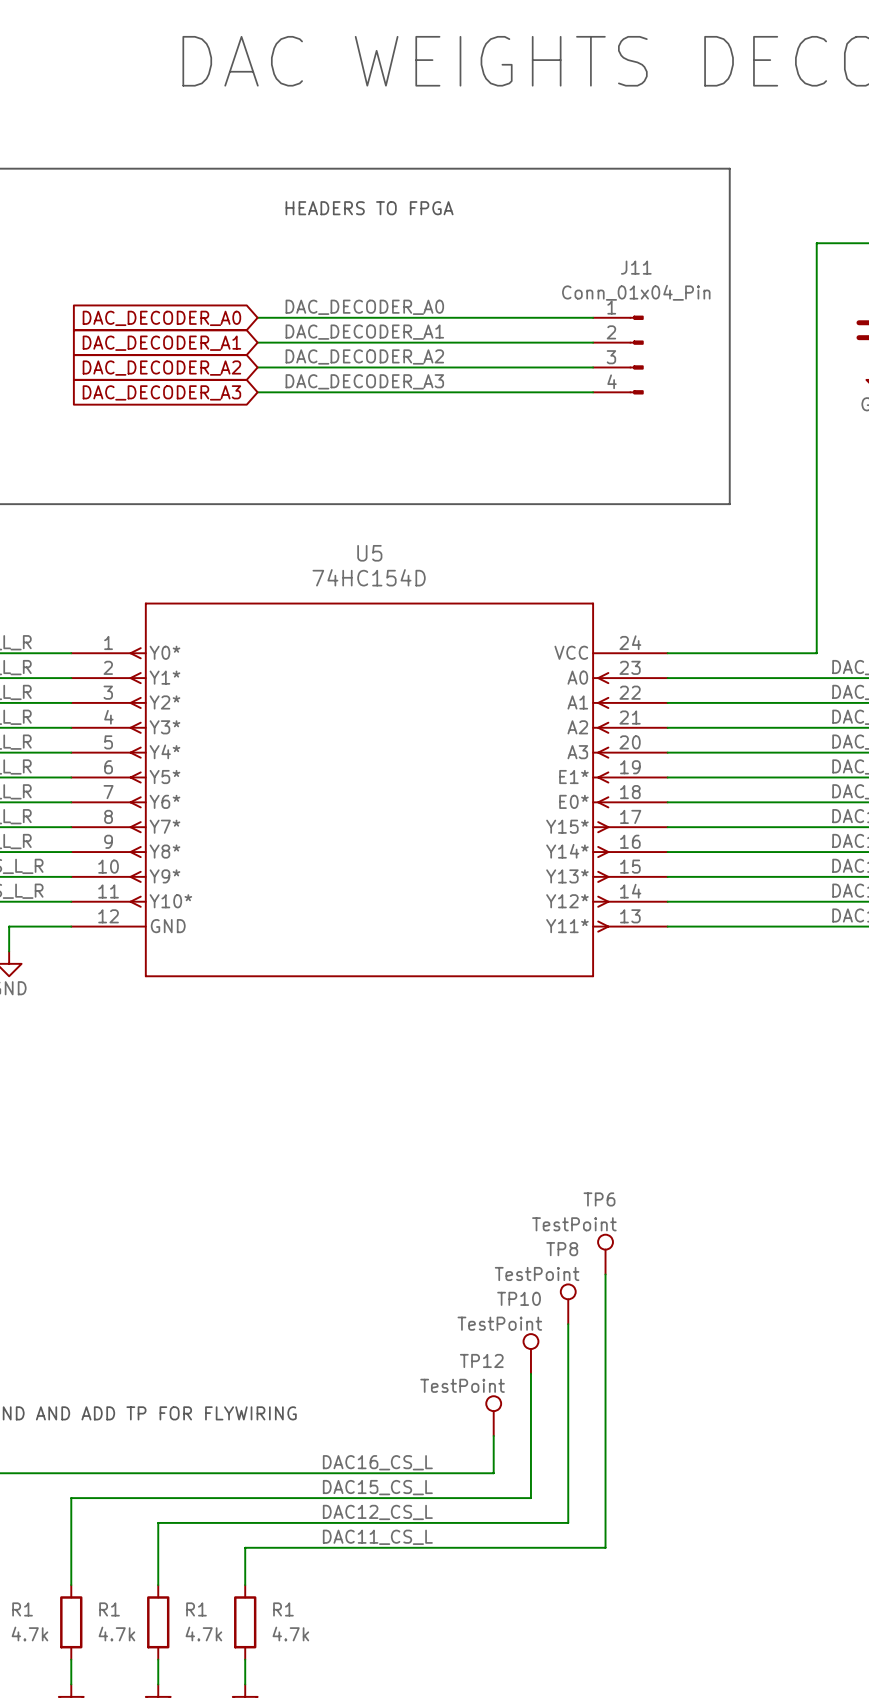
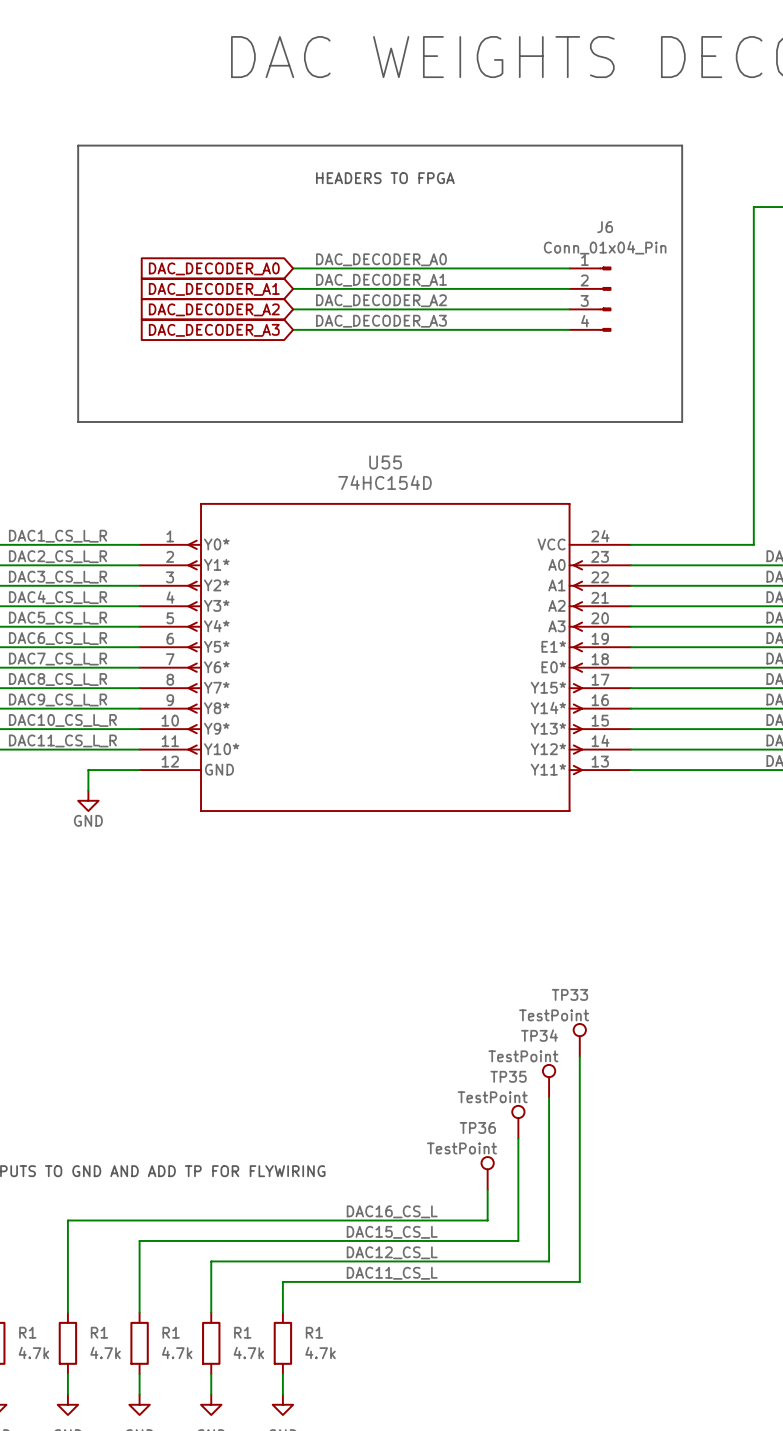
J11 name: J11 (636, 267) -> J6 (605, 227)
U5 name: U5 (369, 553) -> U55 (385, 462)
TP6 name: TP6 (599, 1199) -> TP33 (569, 994)
TP8 name: TP8 (562, 1249) -> TP34 (539, 1035)
TP10 name: TP10 (519, 1298) -> TP35 (508, 1076)
TP12 name: TP12 (481, 1360) -> TP36 (477, 1127)

